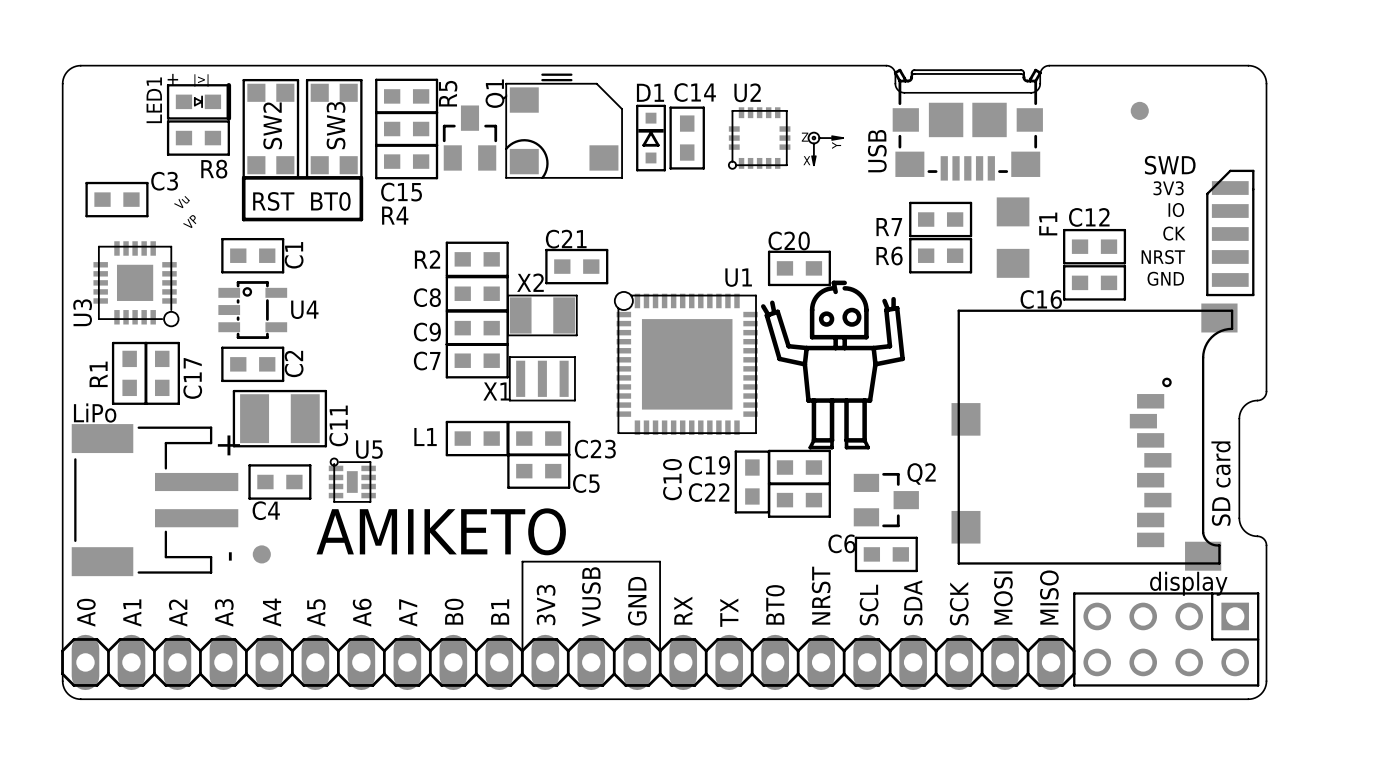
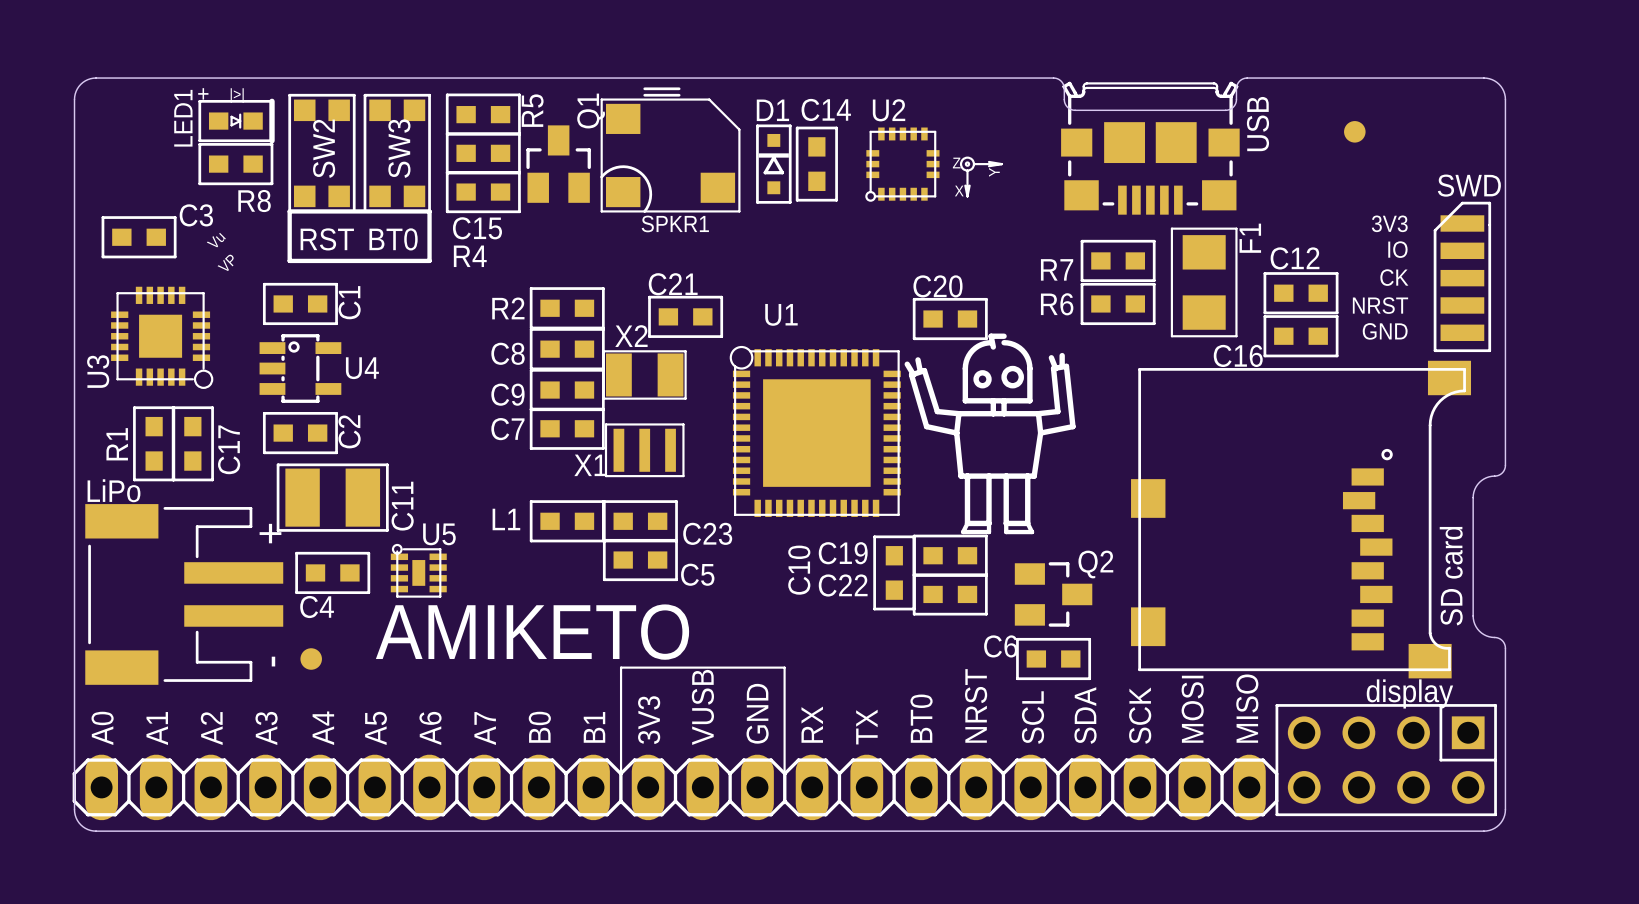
text position: USB (877, 151) -> USB (1257, 124)
text position: SWD (1170, 165) -> SWD (1469, 185)
SPKR1 name: none -> SPKR1 (675, 223)
F1 footprint: [996, 197, 1030, 278] -> [1170, 227, 1238, 338]
U1 name position: U1 (738, 277) -> U1 (781, 314)

